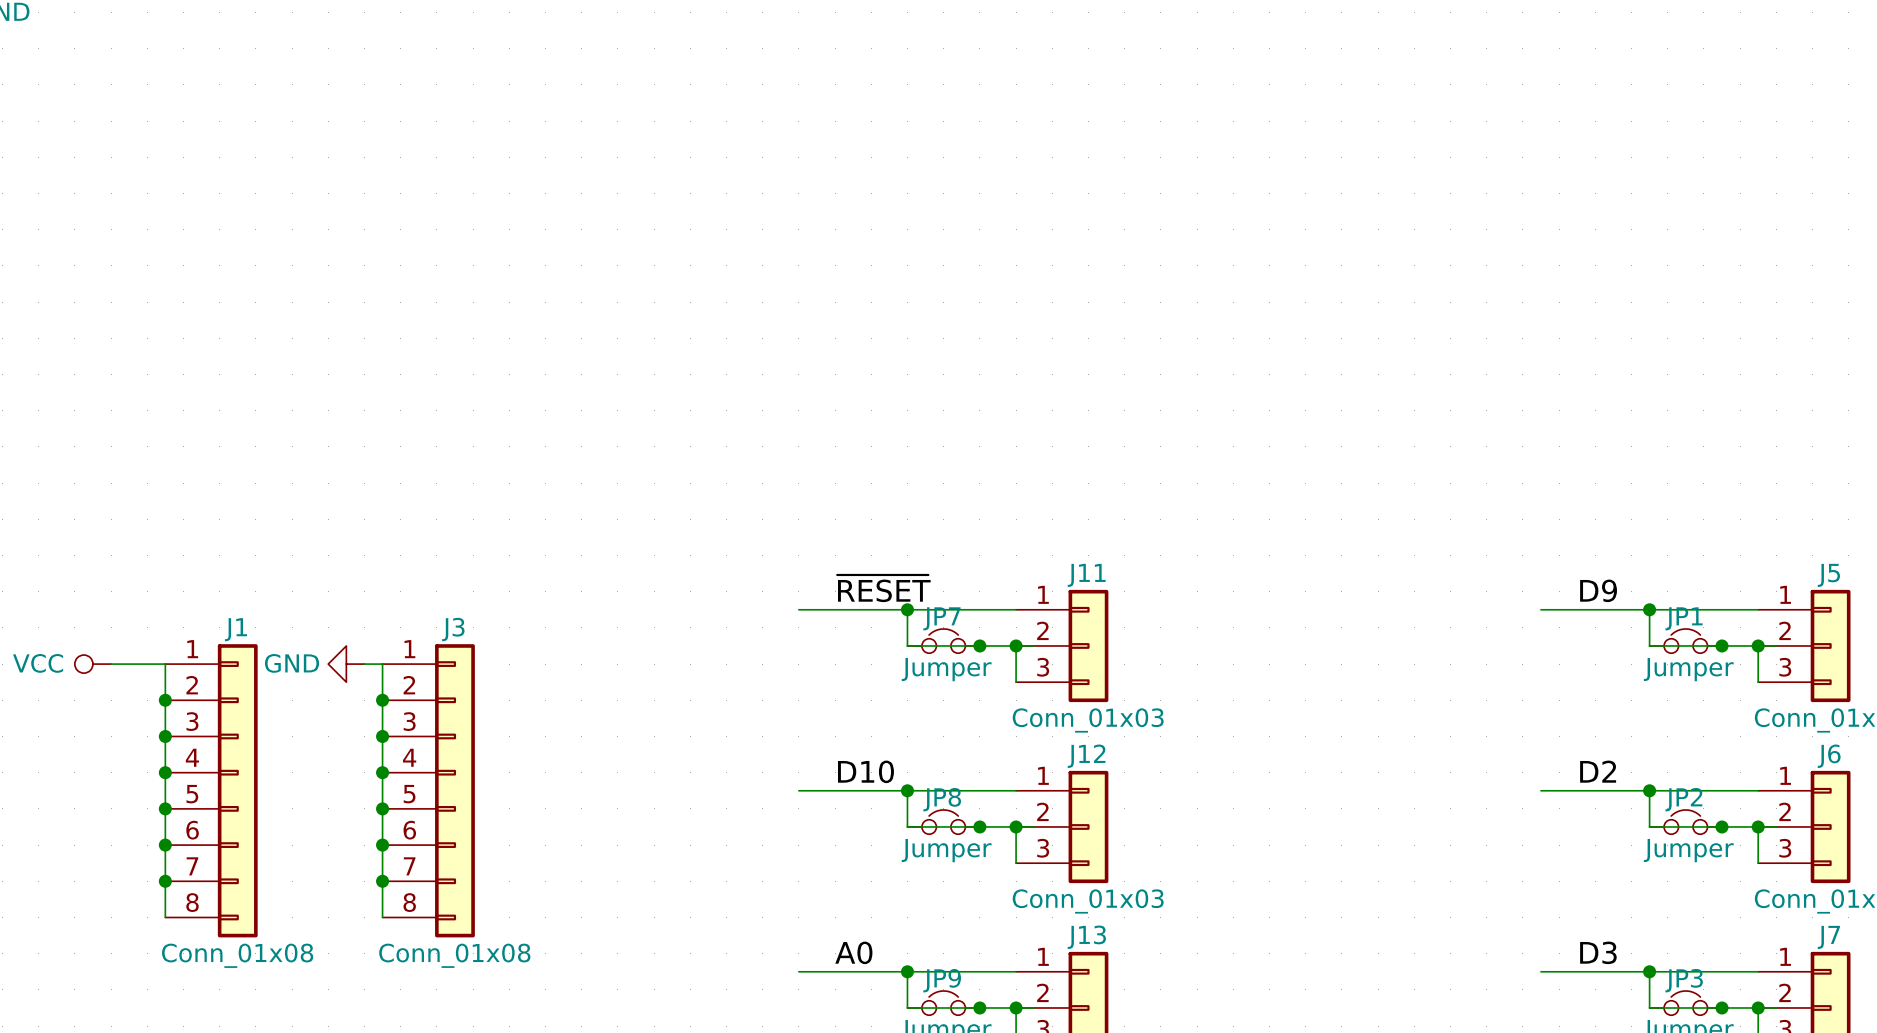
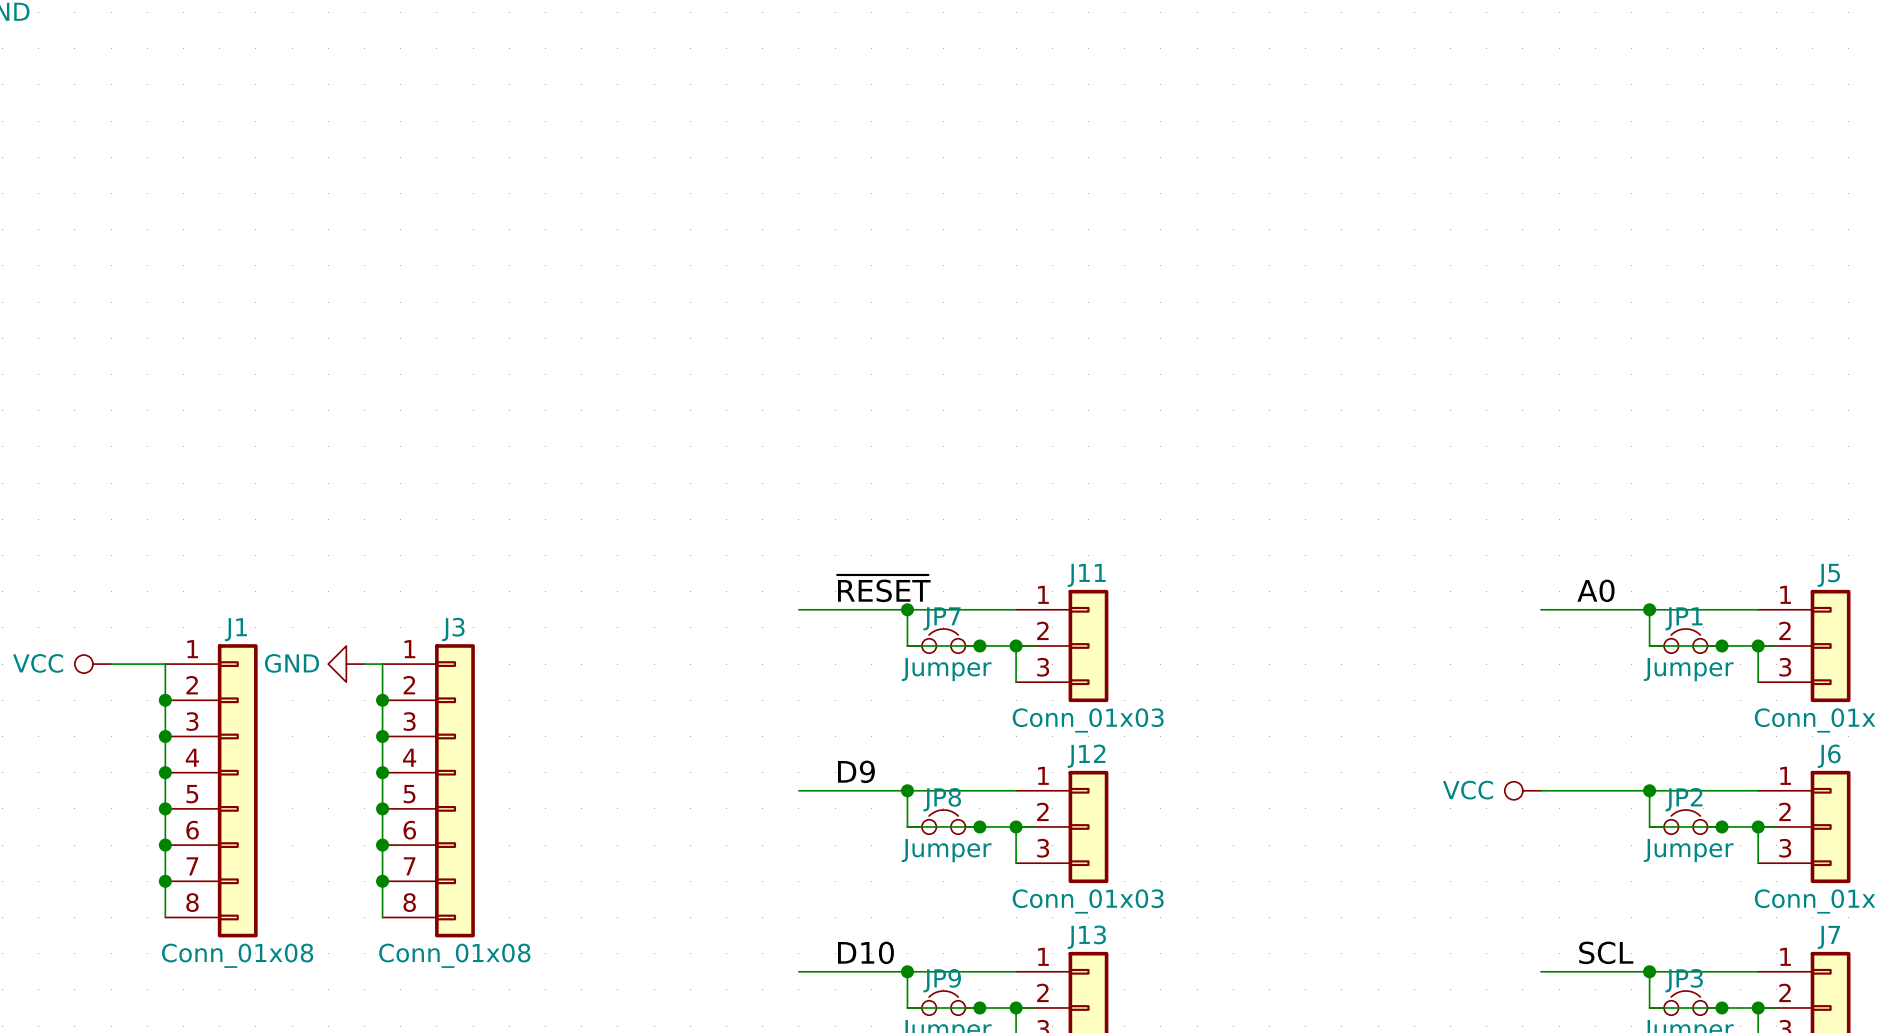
label: D9 (1598, 590) -> A0 (1595, 590)
label: D10 (865, 771) -> D9 (856, 771)
label: D2 (1598, 771) -> none
power symbol: none -> VCC (1522, 790)
label: A0 (853, 952) -> D10 (865, 952)
label: D3 (1598, 952) -> SCL (1606, 952)

